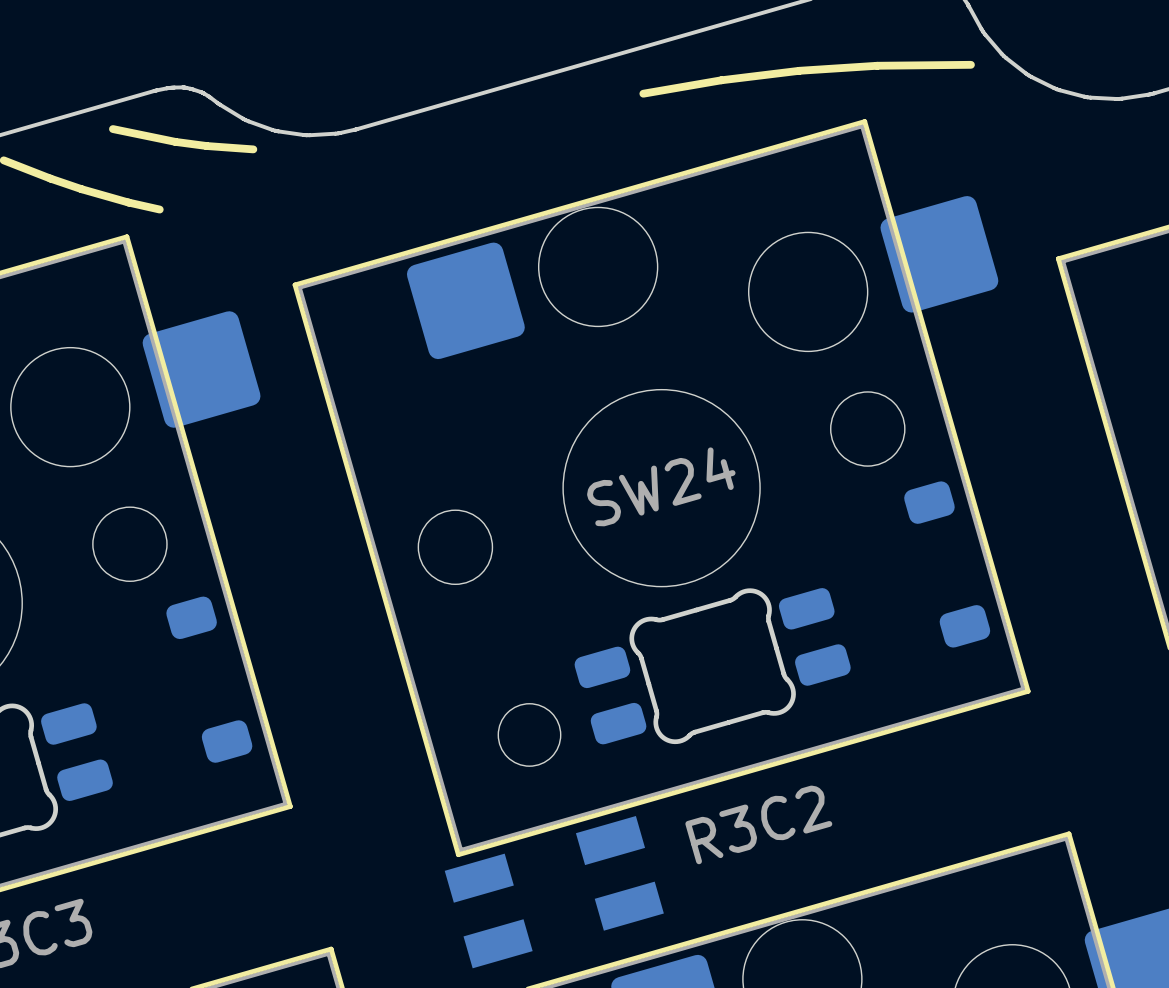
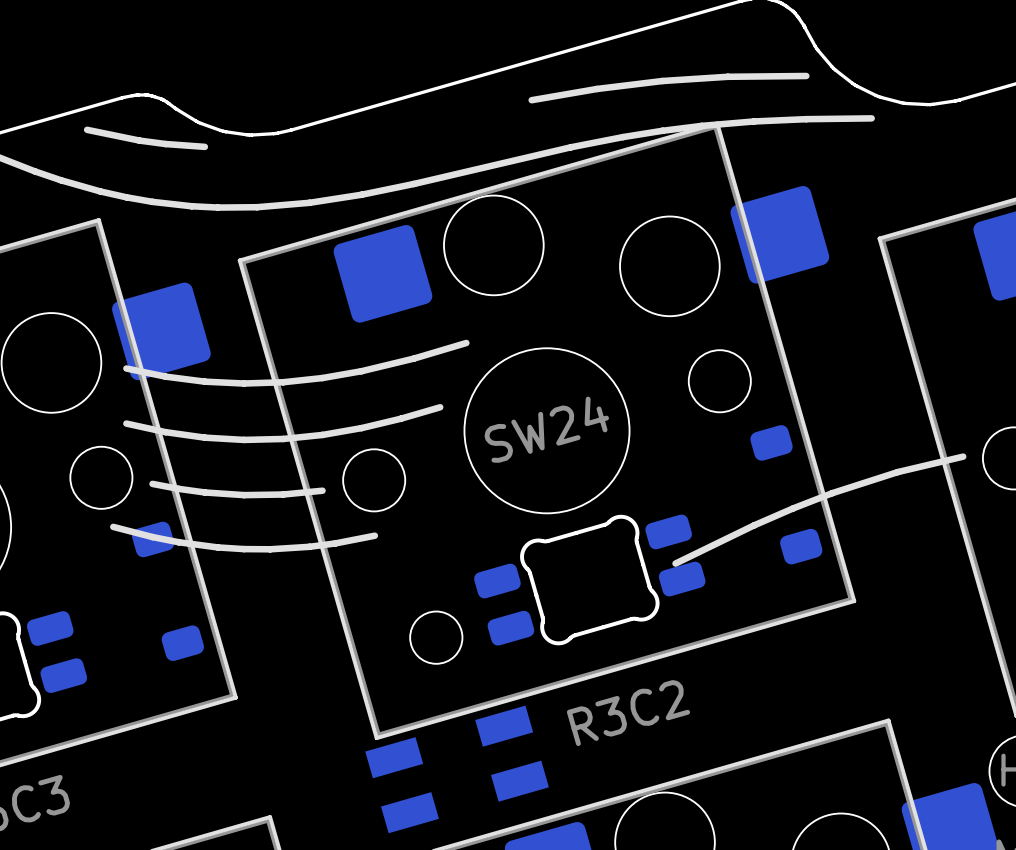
line: none -> (871, 118) (753, 121) (662, 130) (570, 147) (361, 194) (309, 202) (257, 207) (217, 207) (152, 201) (126, 197)
line: none -> (466, 343) (361, 371) (283, 382) (244, 383) (204, 381) (165, 376) (126, 368)
line: none -> (440, 407) (361, 428) (283, 438) (244, 439) (204, 437) (165, 432) (126, 423)
line: none -> (963, 456) (897, 472) (832, 493) (753, 525) (675, 563)
line: none -> (152, 483) (204, 492) (244, 495) (283, 494) (322, 490)
line: none -> (113, 526) (178, 542) (244, 549) (309, 546) (374, 535)

